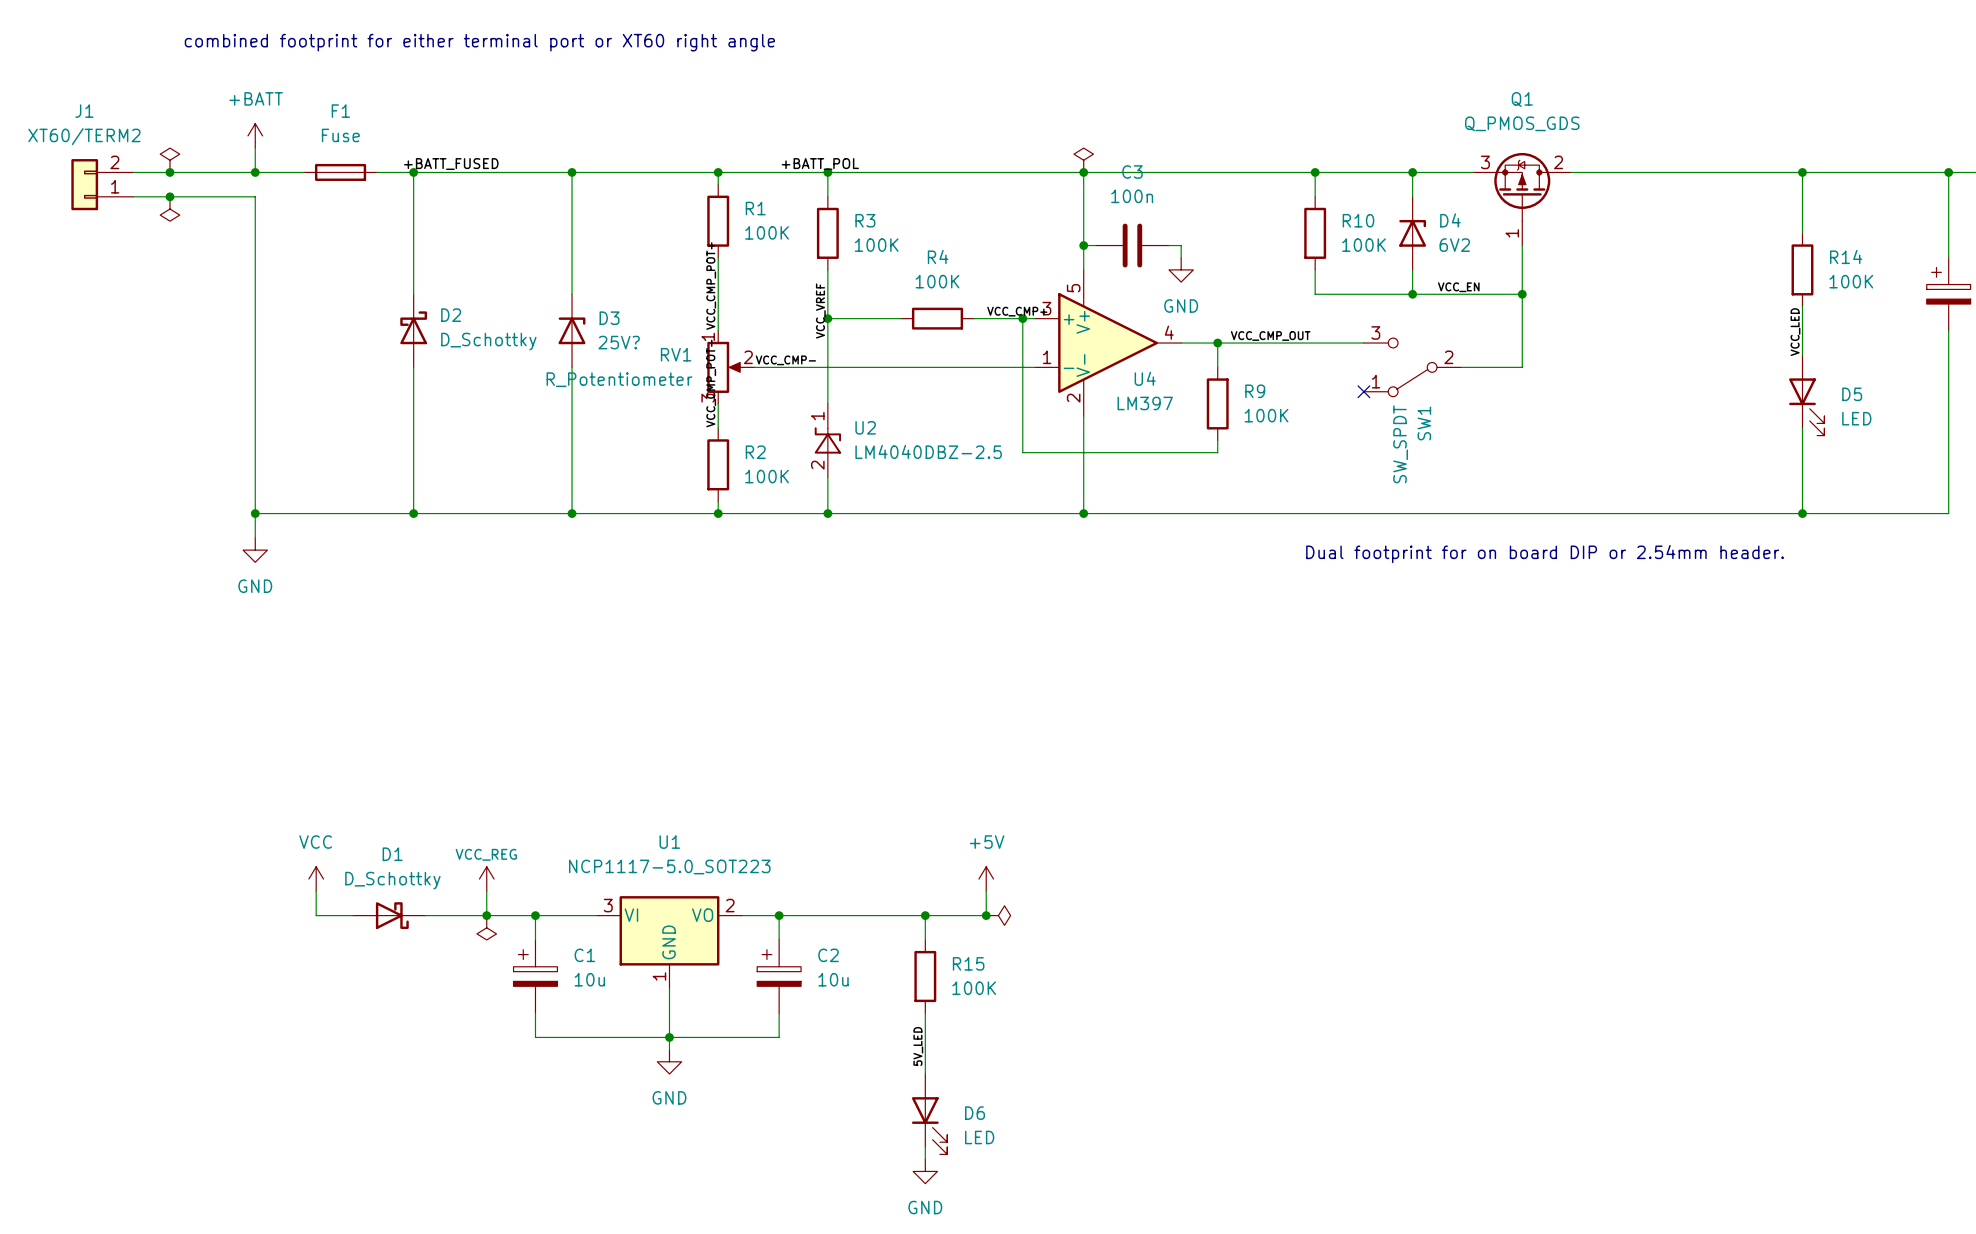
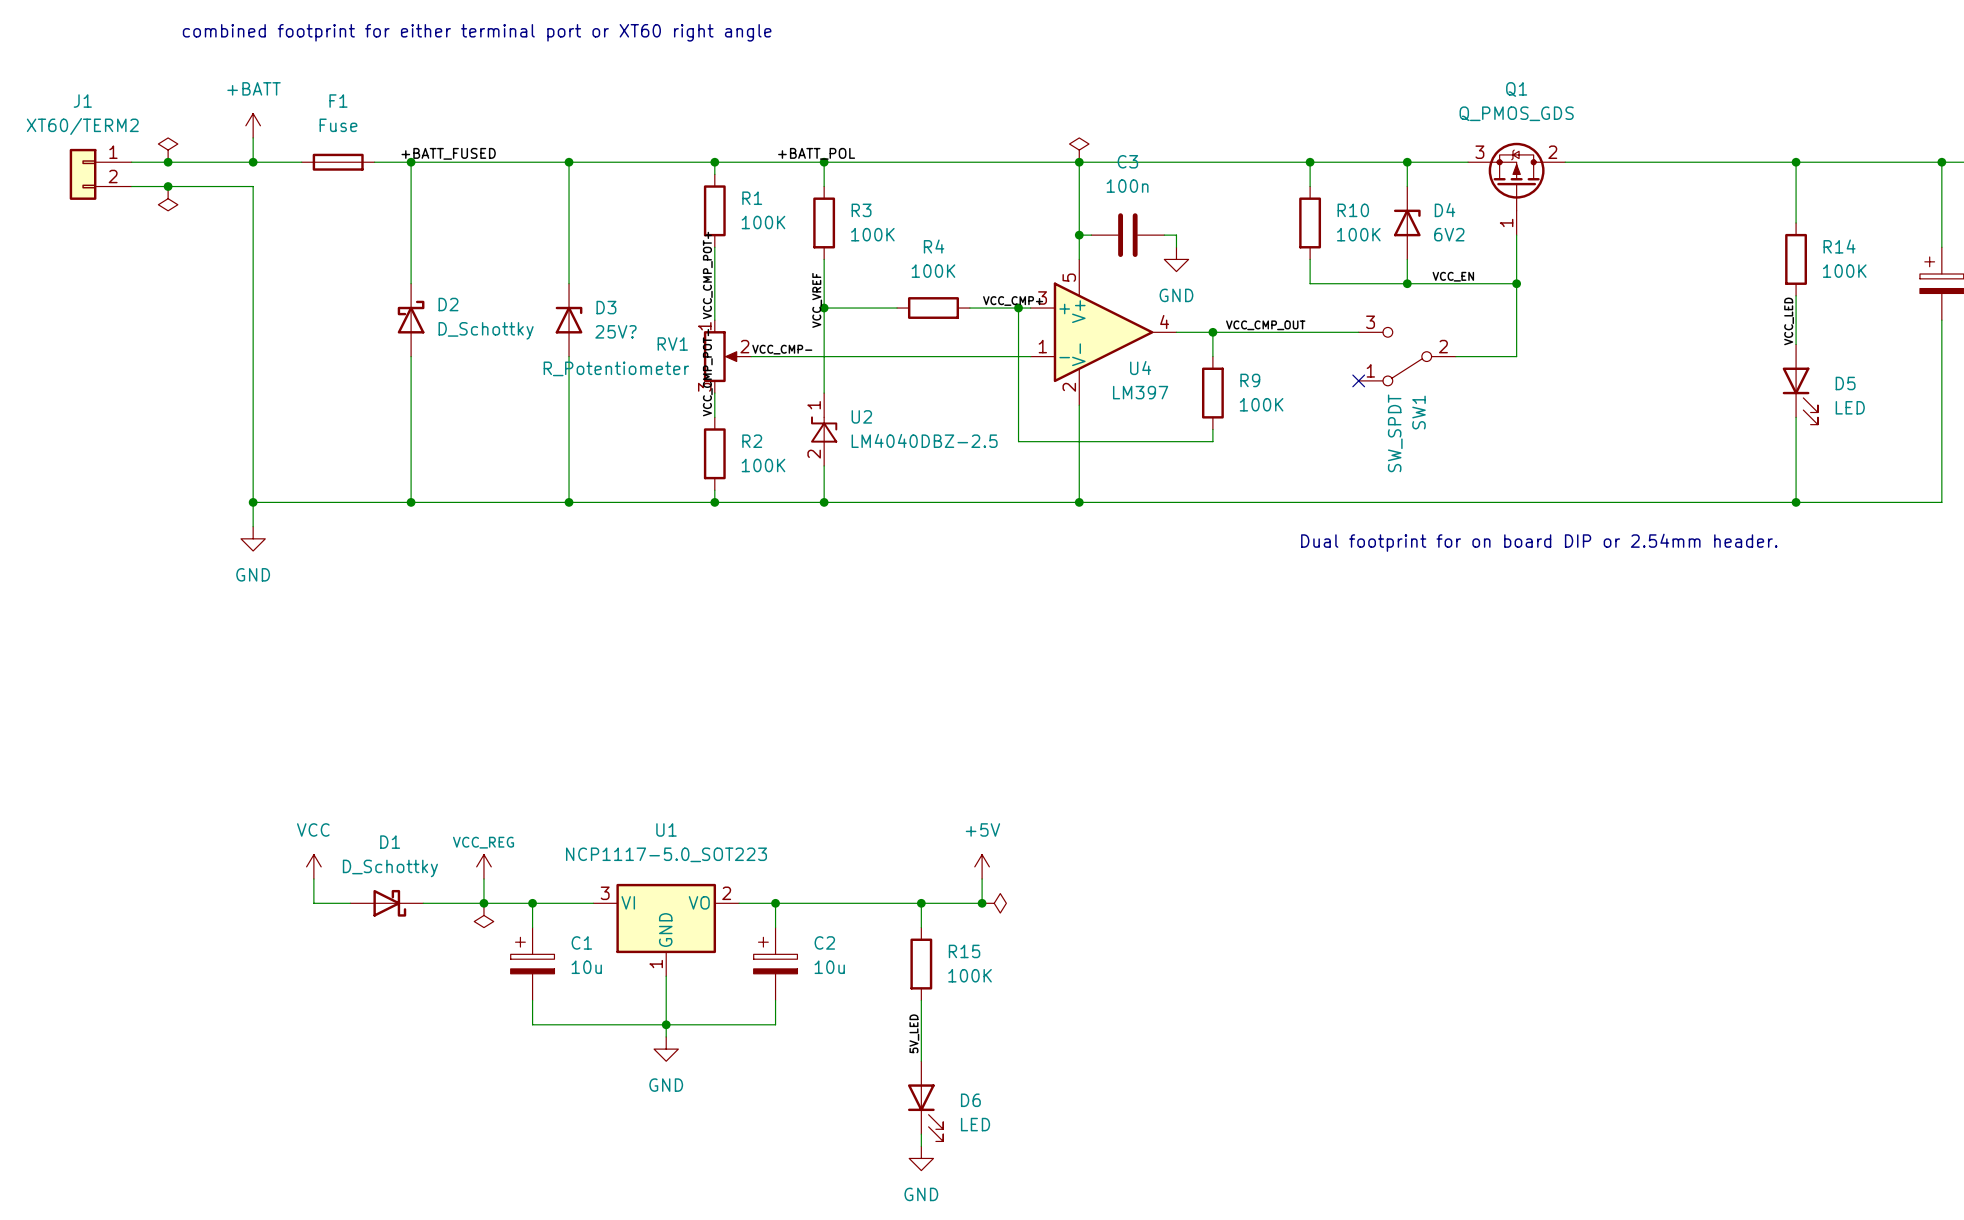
J1 flip: as is (84, 184) -> up-down (83, 174)

